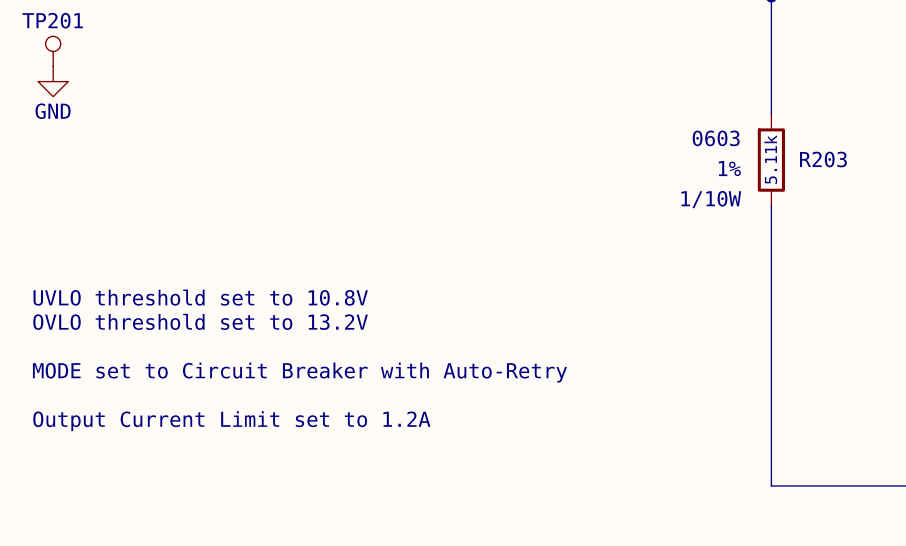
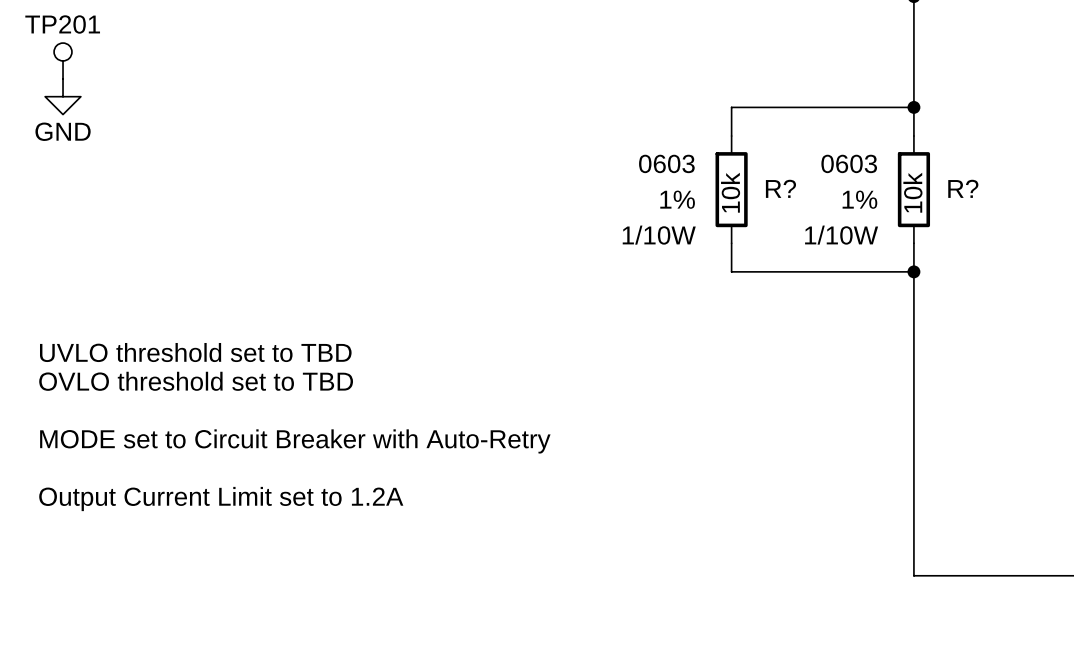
wire: none -> (913, 107) (731, 107) (731, 136)
junction: none -> (913, 107)
R203 value: 5.11k (770, 159) -> 10k (912, 192)
R203 name: R203 (823, 159) -> R? (963, 188)
R?: none -> 10k (731, 189)
wire: none -> (731, 243) (731, 271) (913, 271)
junction: none -> (913, 271)
text: UVLO threshold set to 10.8V (200, 297) -> UVLO threshold set to TBD (195, 352)
text: OVLO threshold set to 13.2V (200, 321) -> OVLO threshold set to TBD (196, 381)

